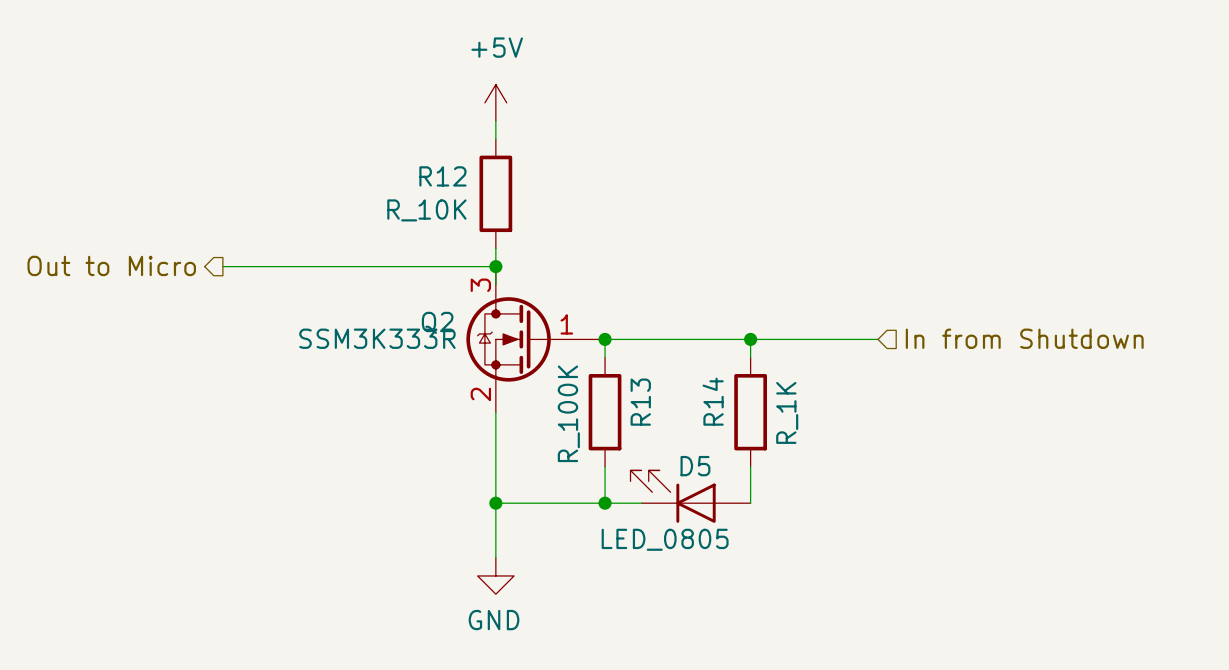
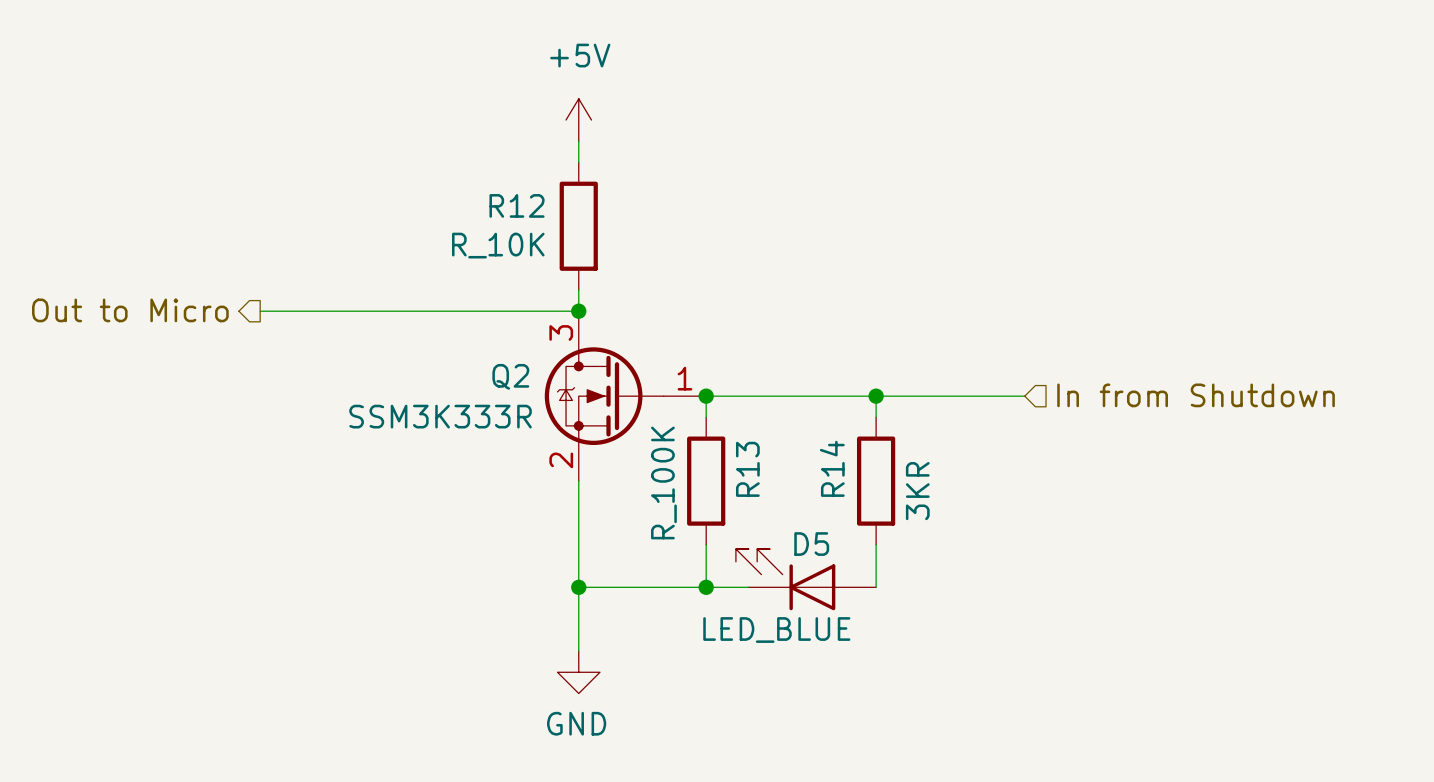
Q2 symbol: [466, 266, 606, 413] -> [544, 311, 707, 482]
R14 value: R_1K (787, 412) -> 3KR (917, 491)
D5 value: LED_0805 (665, 539) -> LED_BLUE (776, 630)

